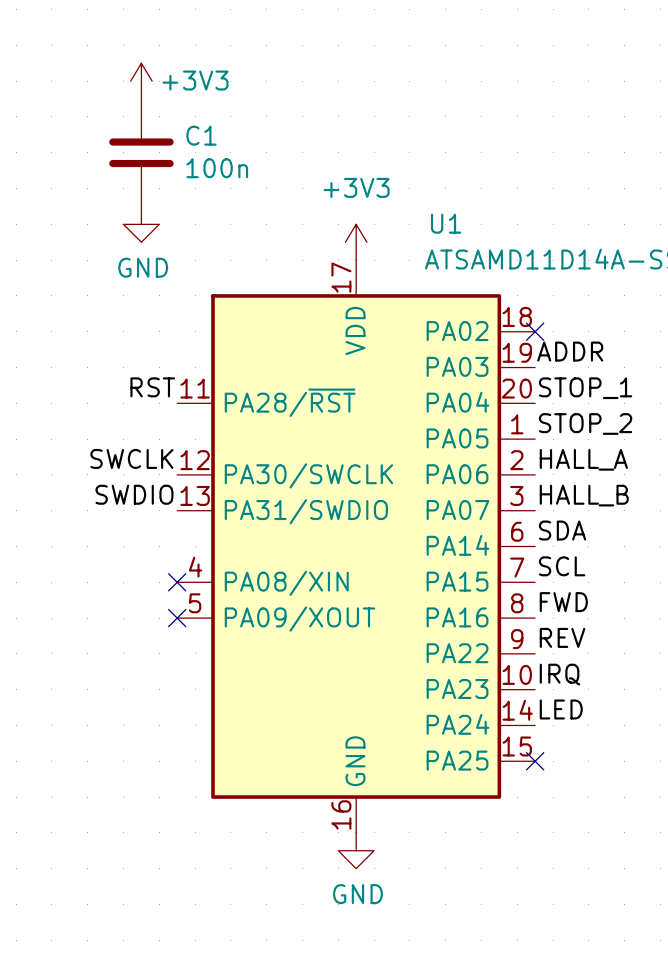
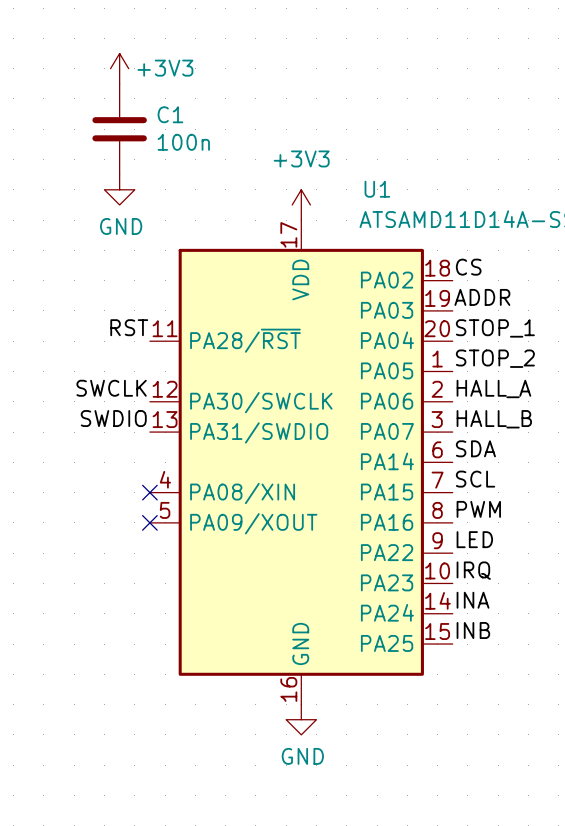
label: none -> CS (468, 267)
no-connect mark: (535, 331) -> none
label: FWD (563, 602) -> PWM (478, 509)
label: REV (562, 637) -> LED (474, 539)
label: LED (561, 709) -> INA (473, 600)
label: none -> INB (473, 630)
no-connect mark: (535, 761) -> none

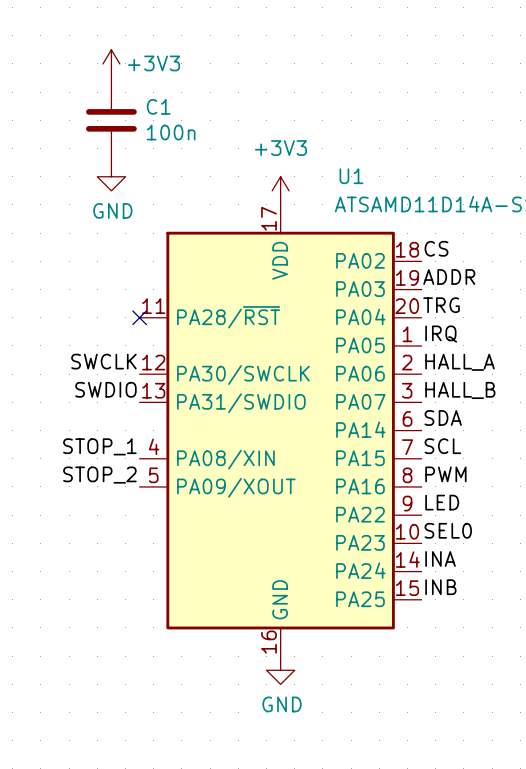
label: RST (129, 327) -> none
label: STOP_1 (495, 328) -> TRG (441, 305)
no-connect mark: none -> (139, 317)
label: STOP_2 (495, 358) -> IRQ (441, 334)
label: none -> STOP_1 (99, 446)
no-connect mark: (149, 492) -> none
label: none -> STOP_2 (99, 475)
no-connect mark: (149, 522) -> none
label: IRQ (473, 570) -> SEL0 (448, 530)

